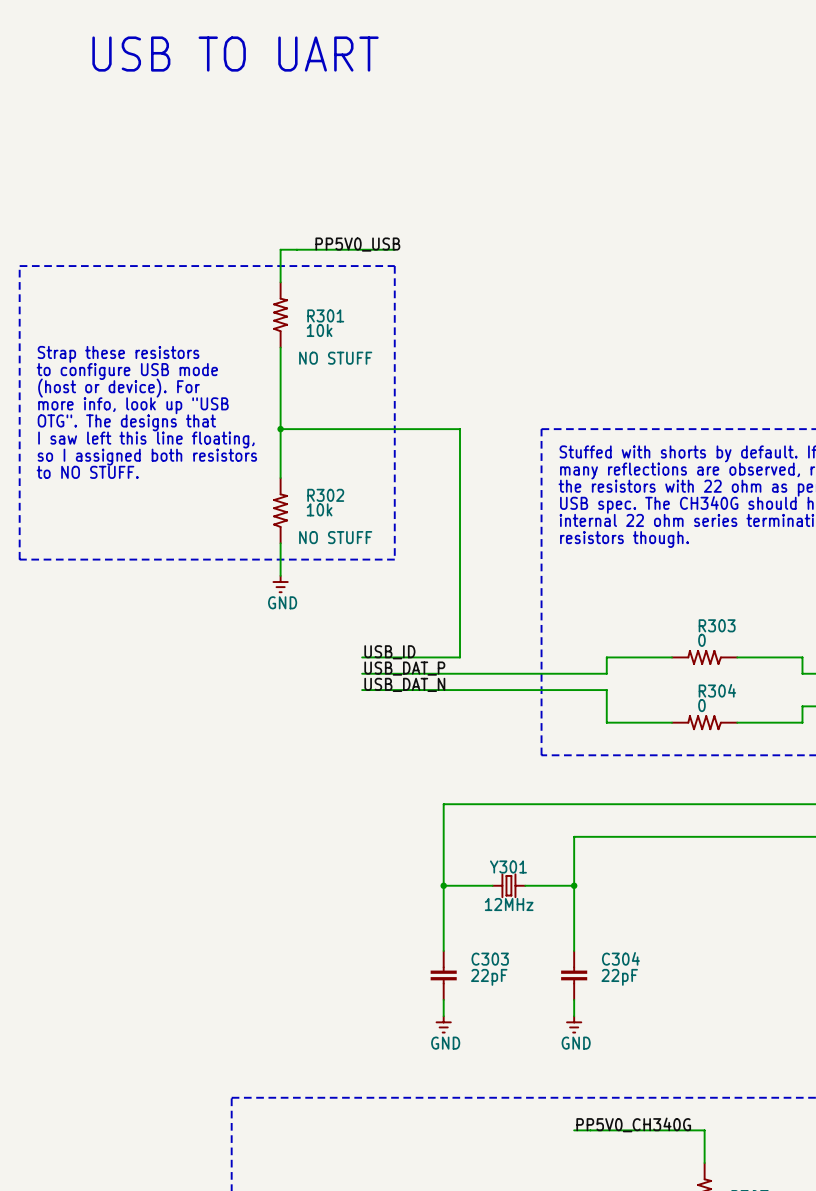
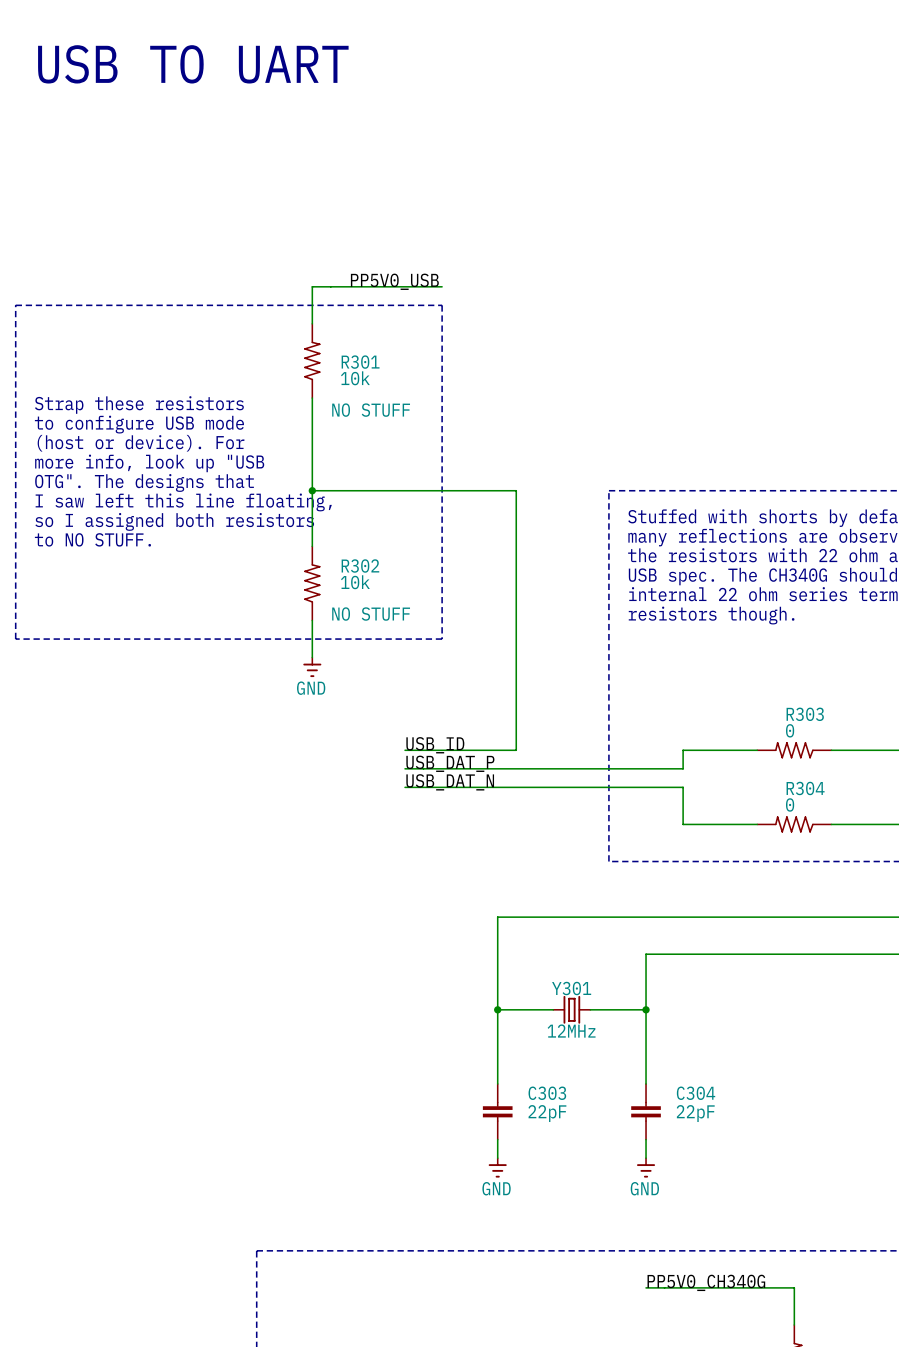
text position: USB TO UART (235, 54) -> USB TO UART (193, 64)

